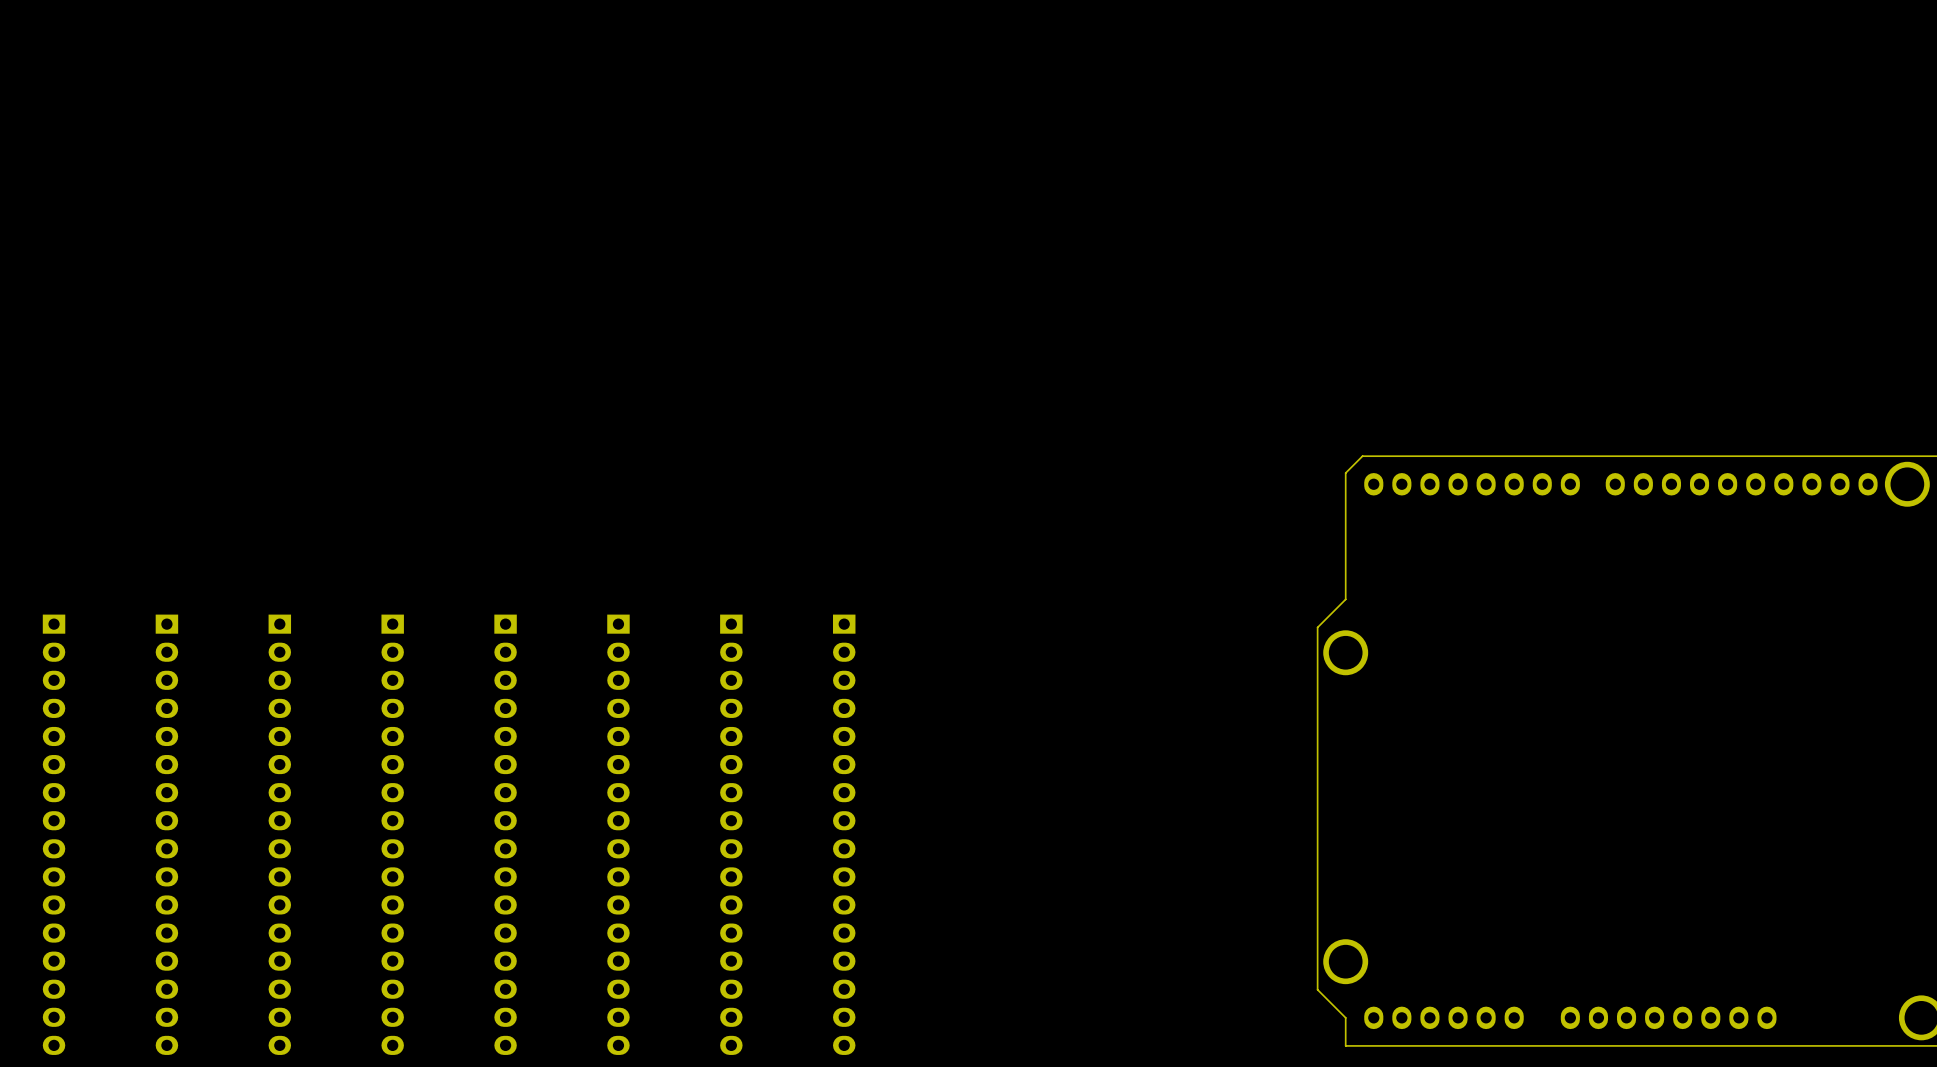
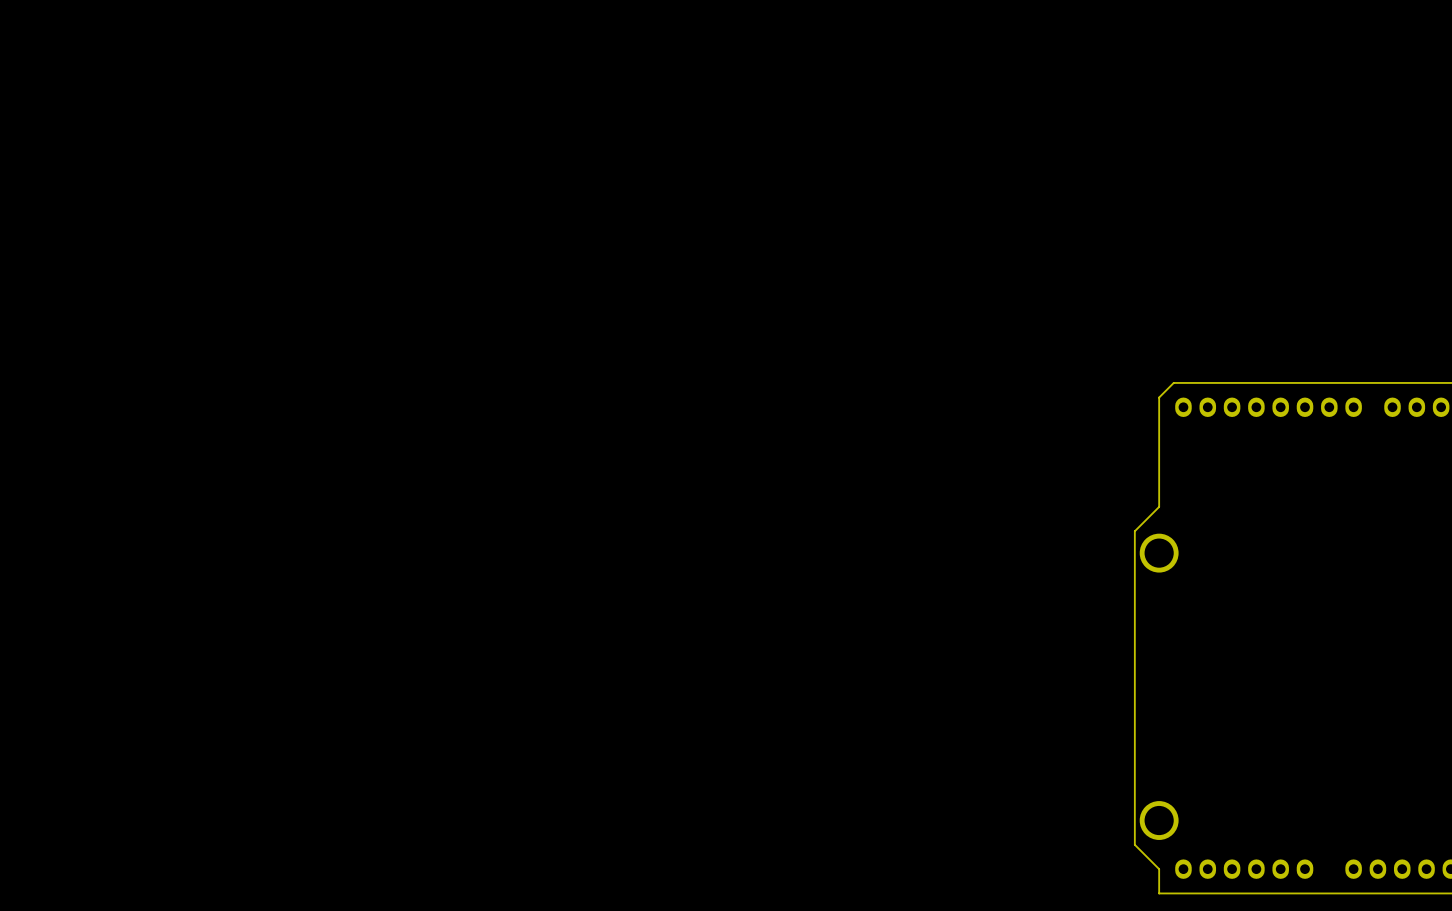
part: (54, 834) -> none
part: (166, 834) -> none
part: (279, 834) -> none
part: (392, 834) -> none
part: (505, 834) -> none
part: (618, 834) -> none
part: (731, 834) -> none
part: (844, 834) -> none

